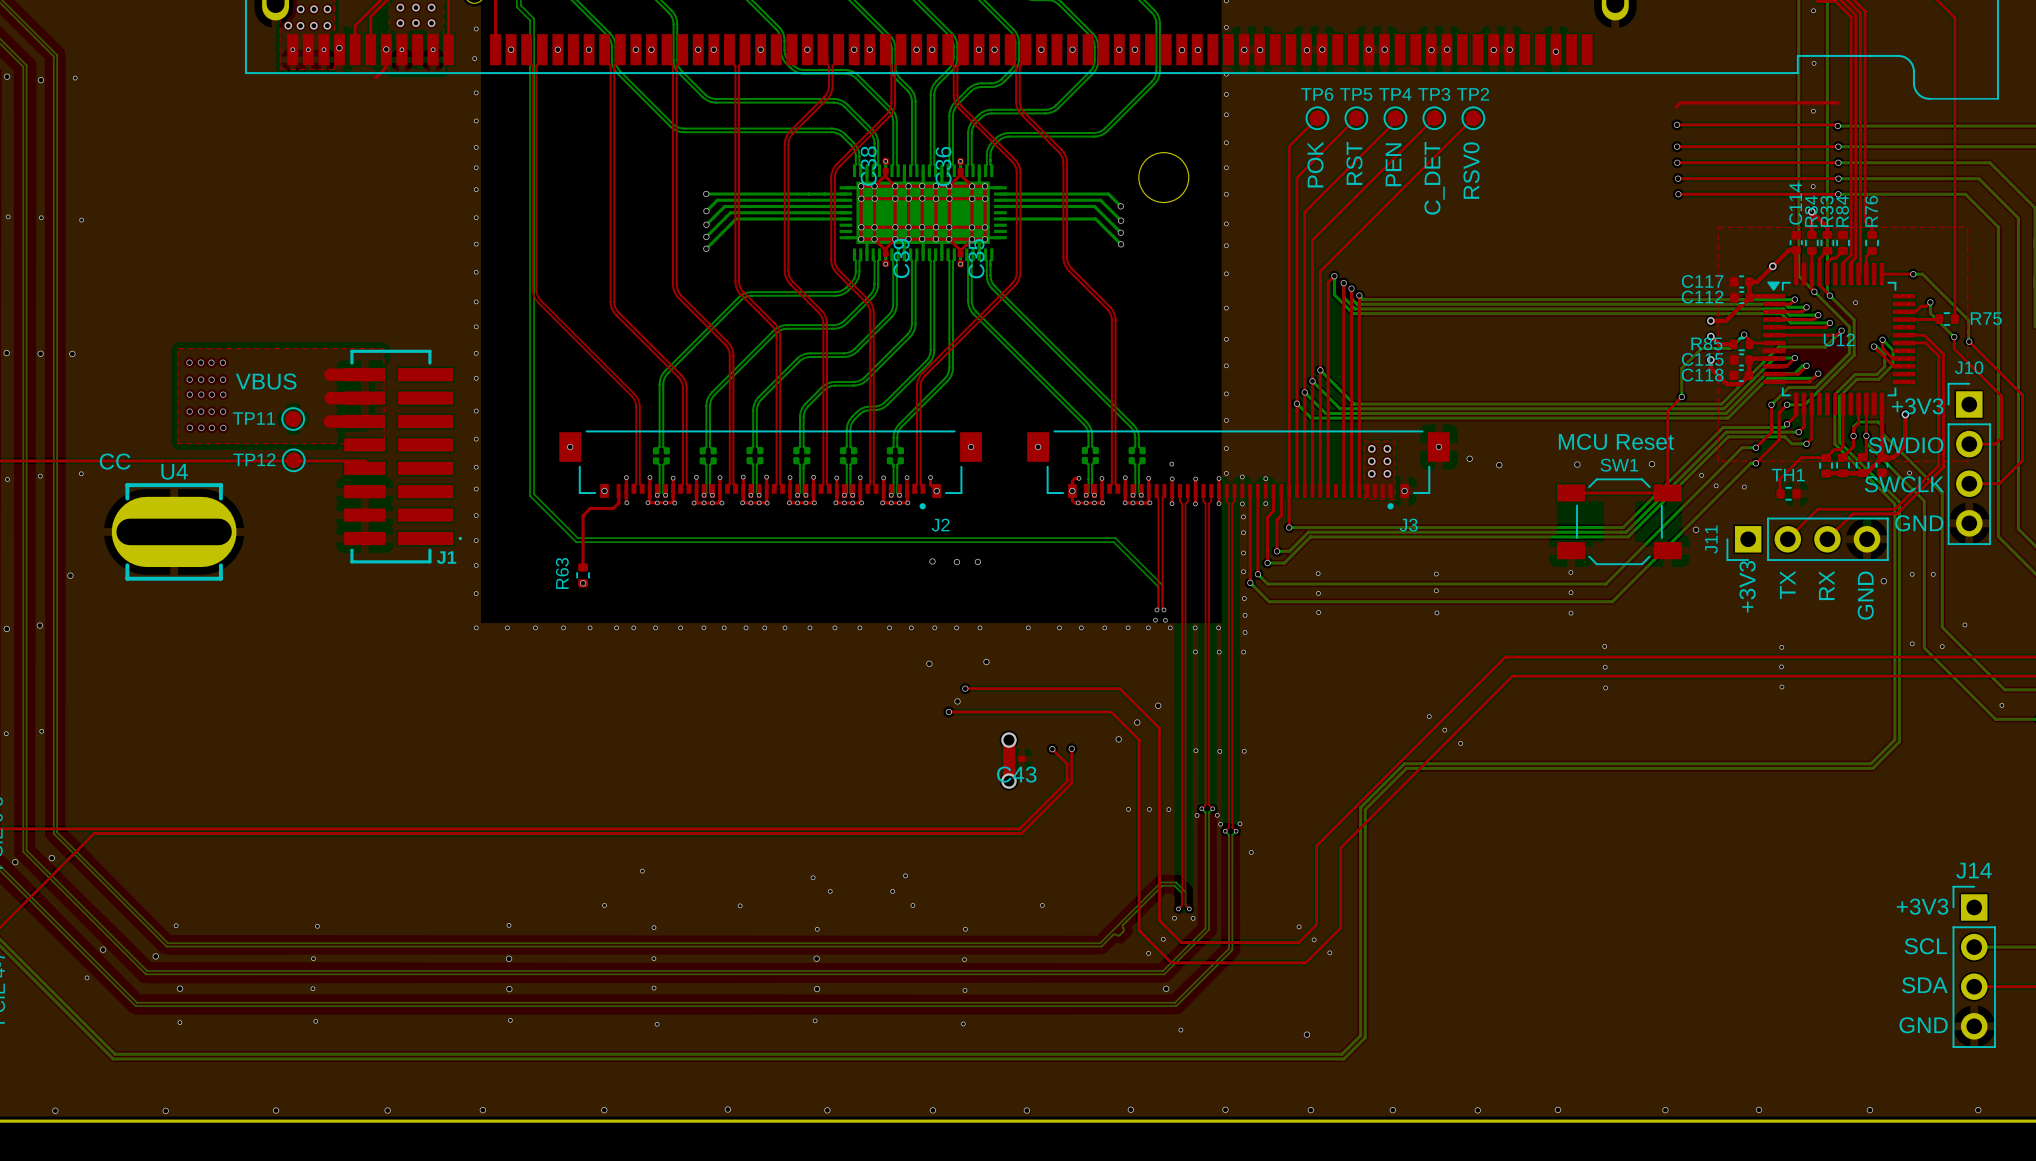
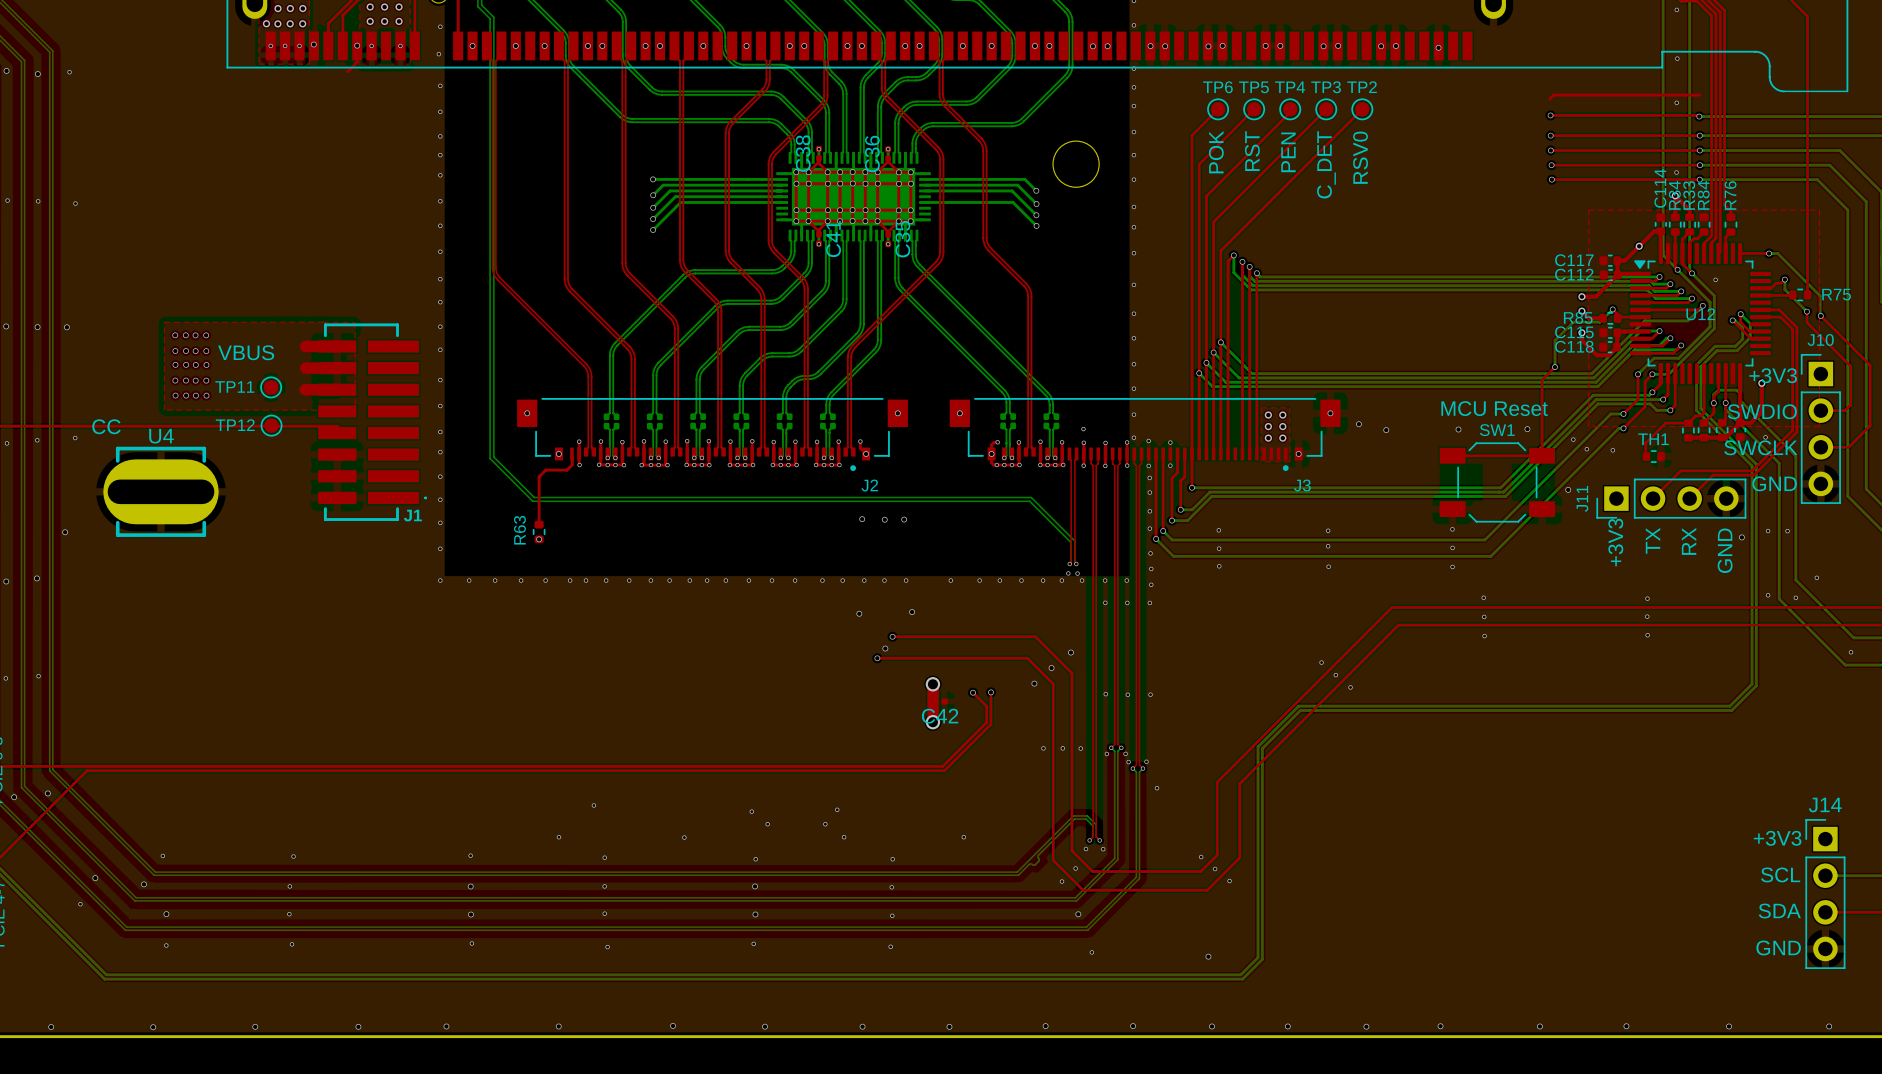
C39 name: C39 (901, 258) -> C41 (833, 238)
C43 name: C43 (1016, 774) -> C42 (940, 716)

